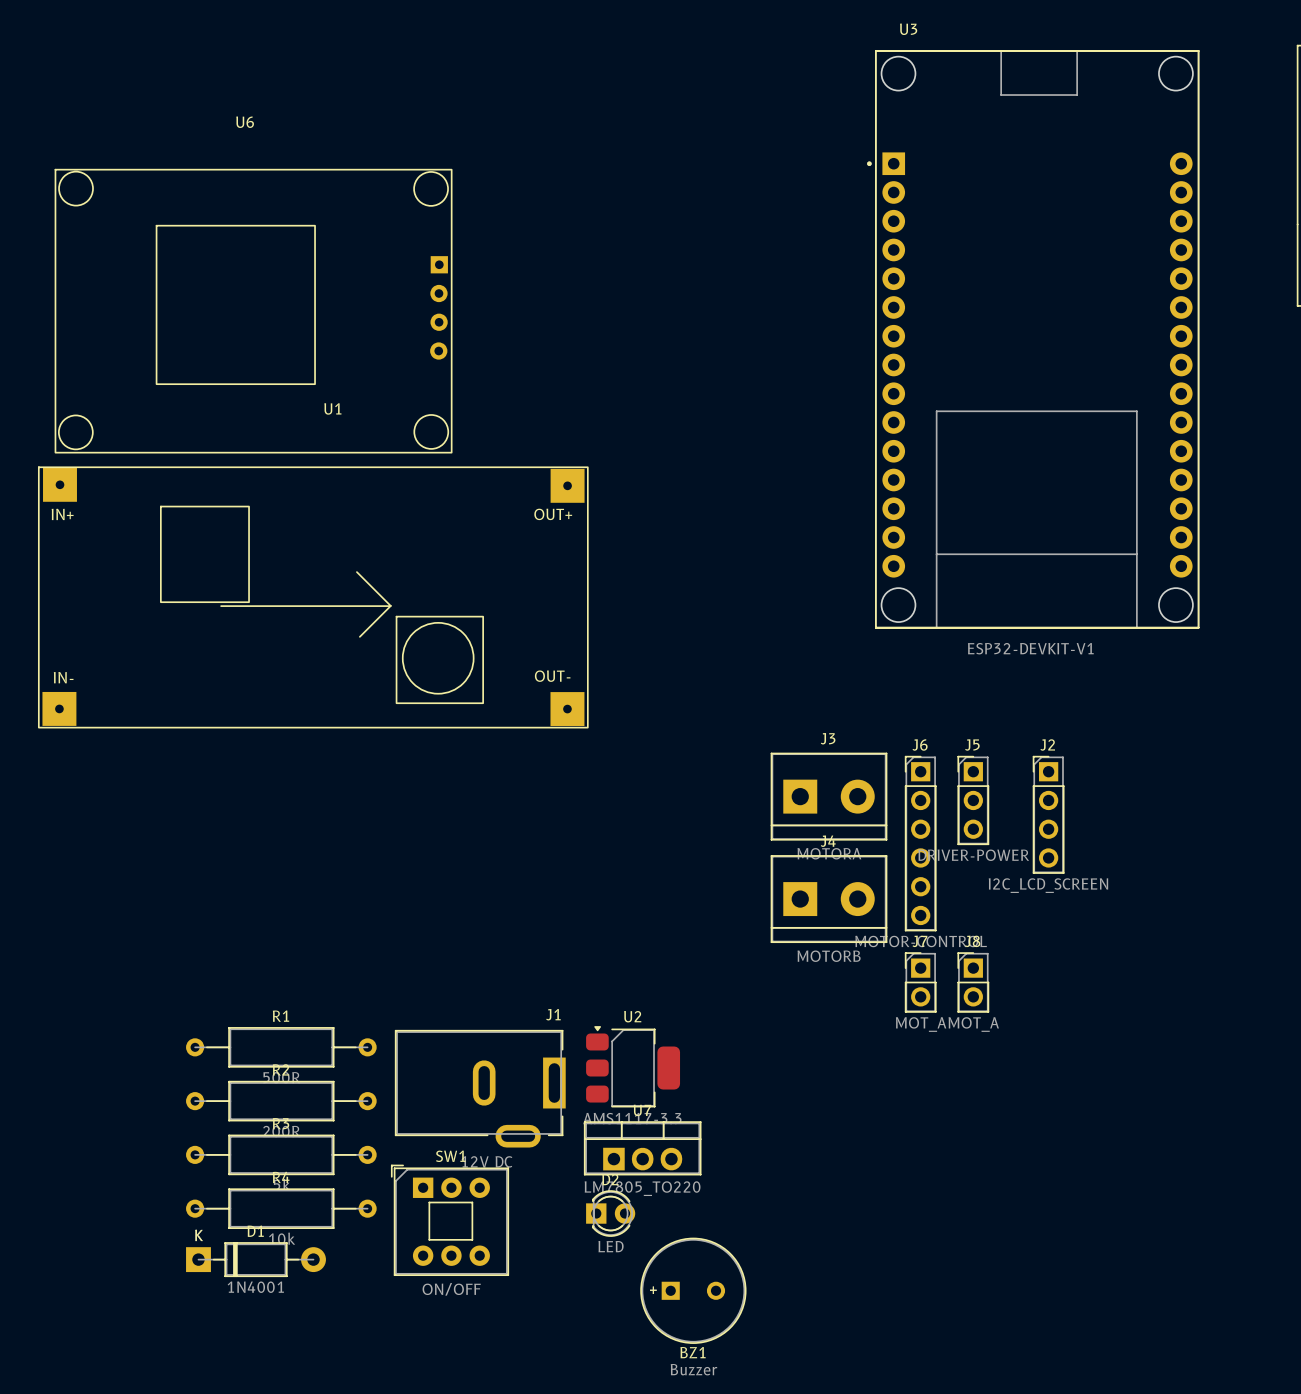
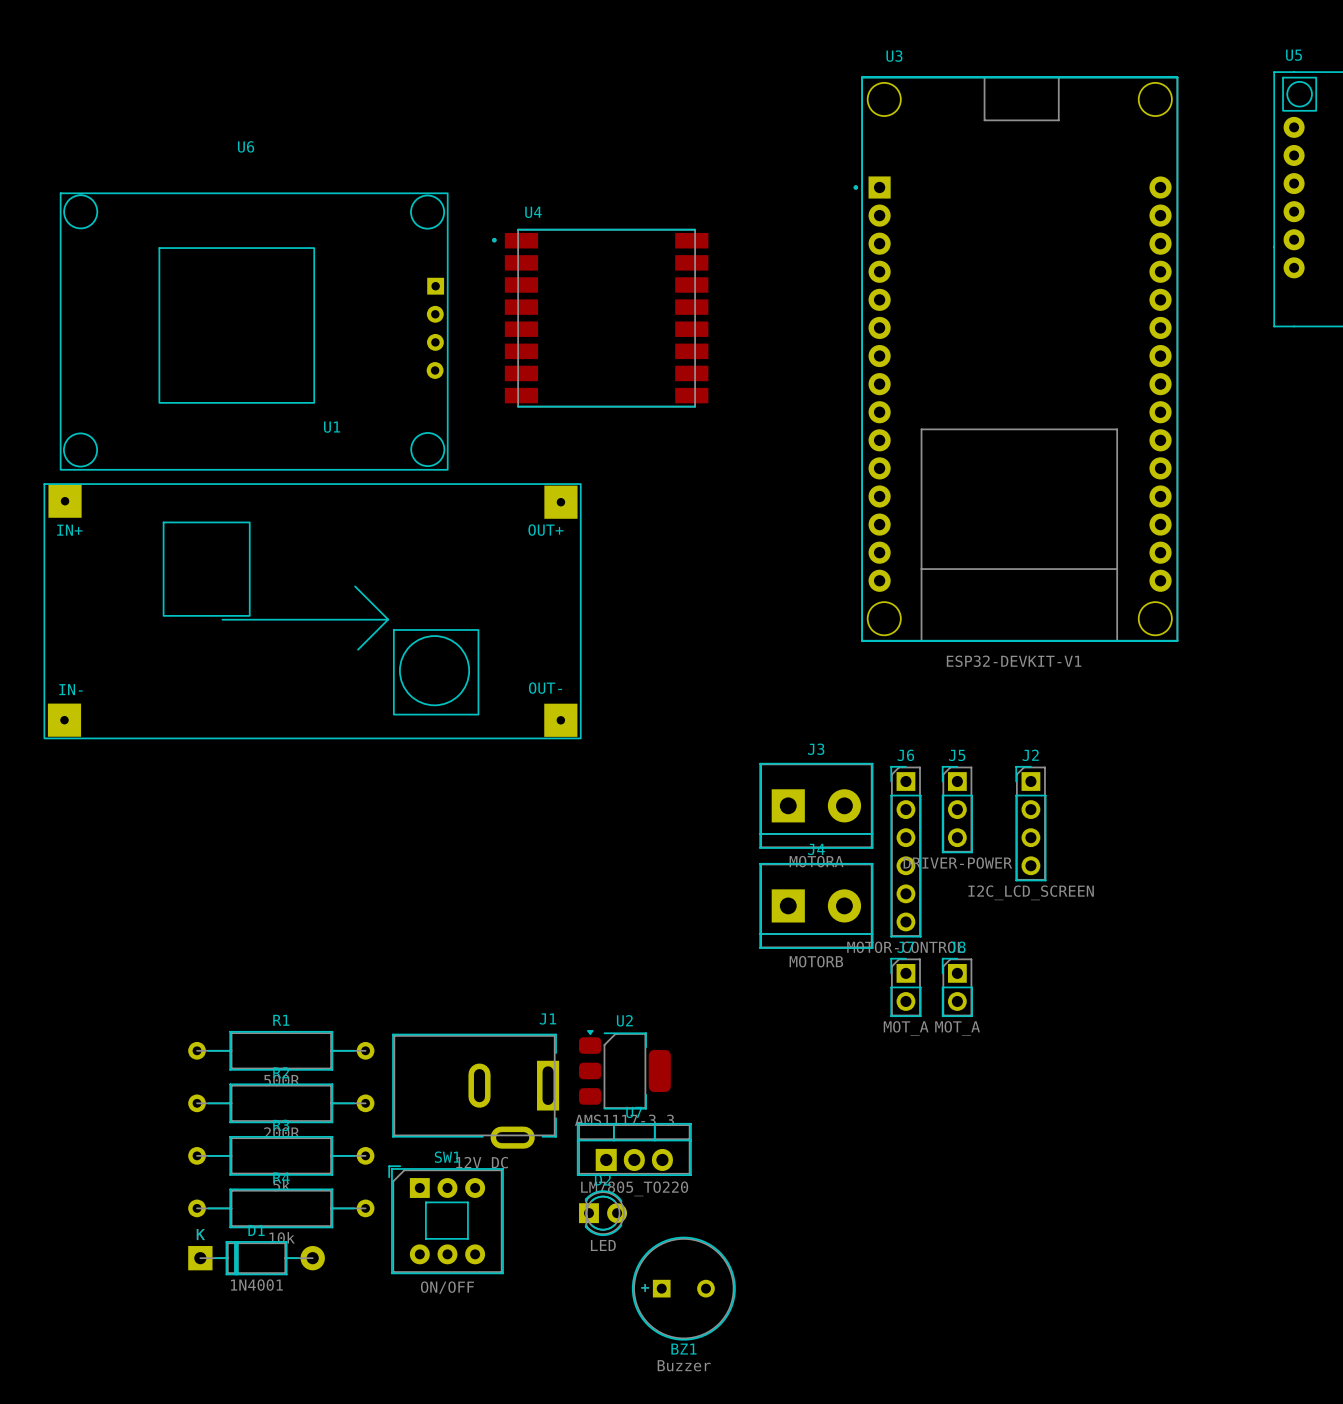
U4: none -> (600, 318)

